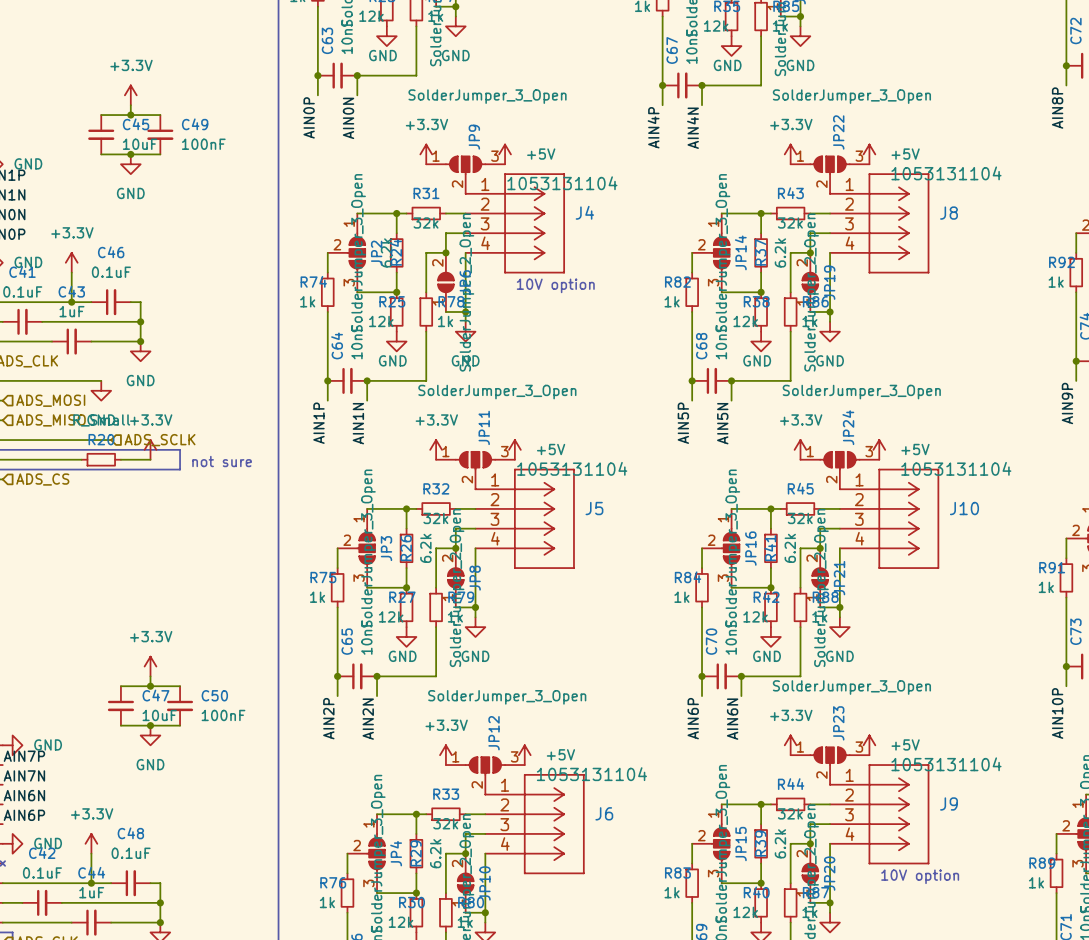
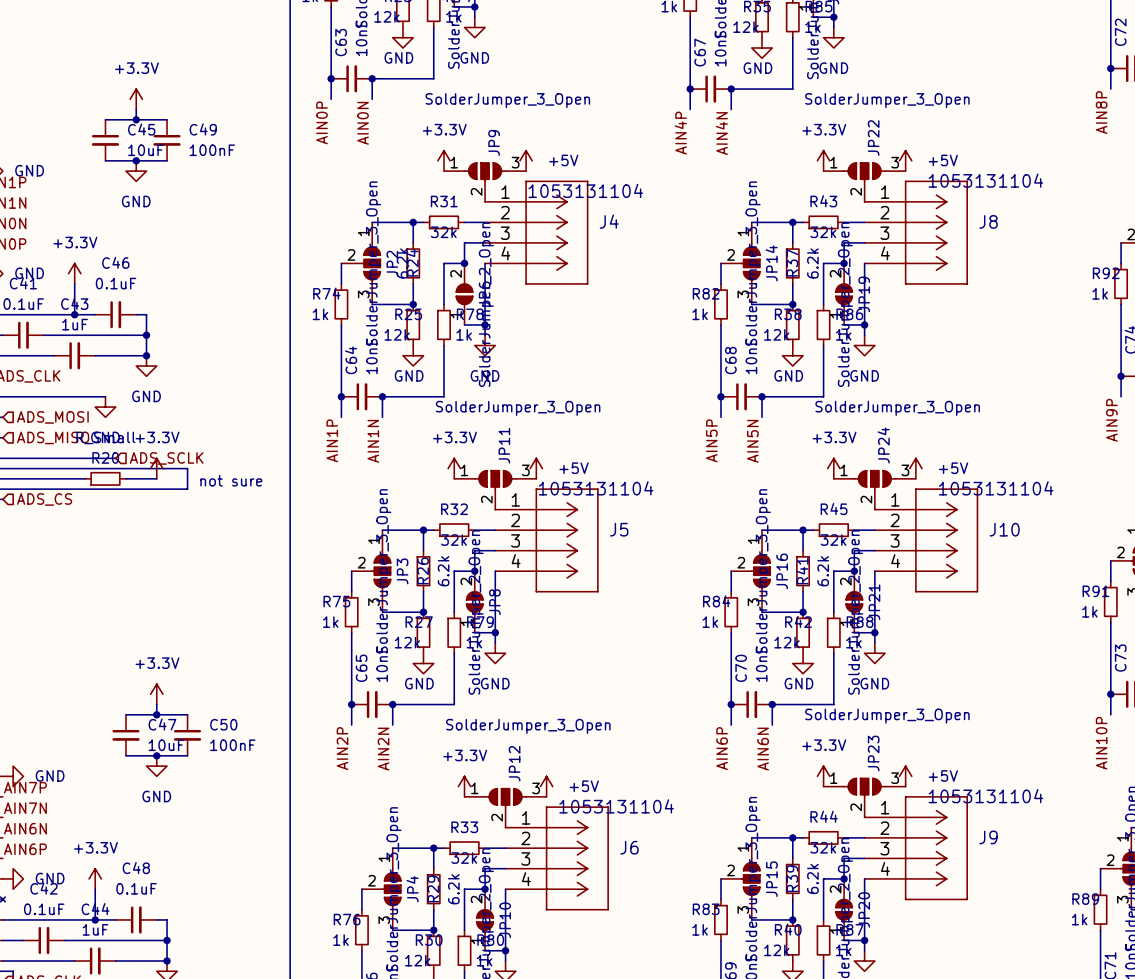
text: 10V option (555, 285) -> none
text: 10V option (920, 876) -> none

